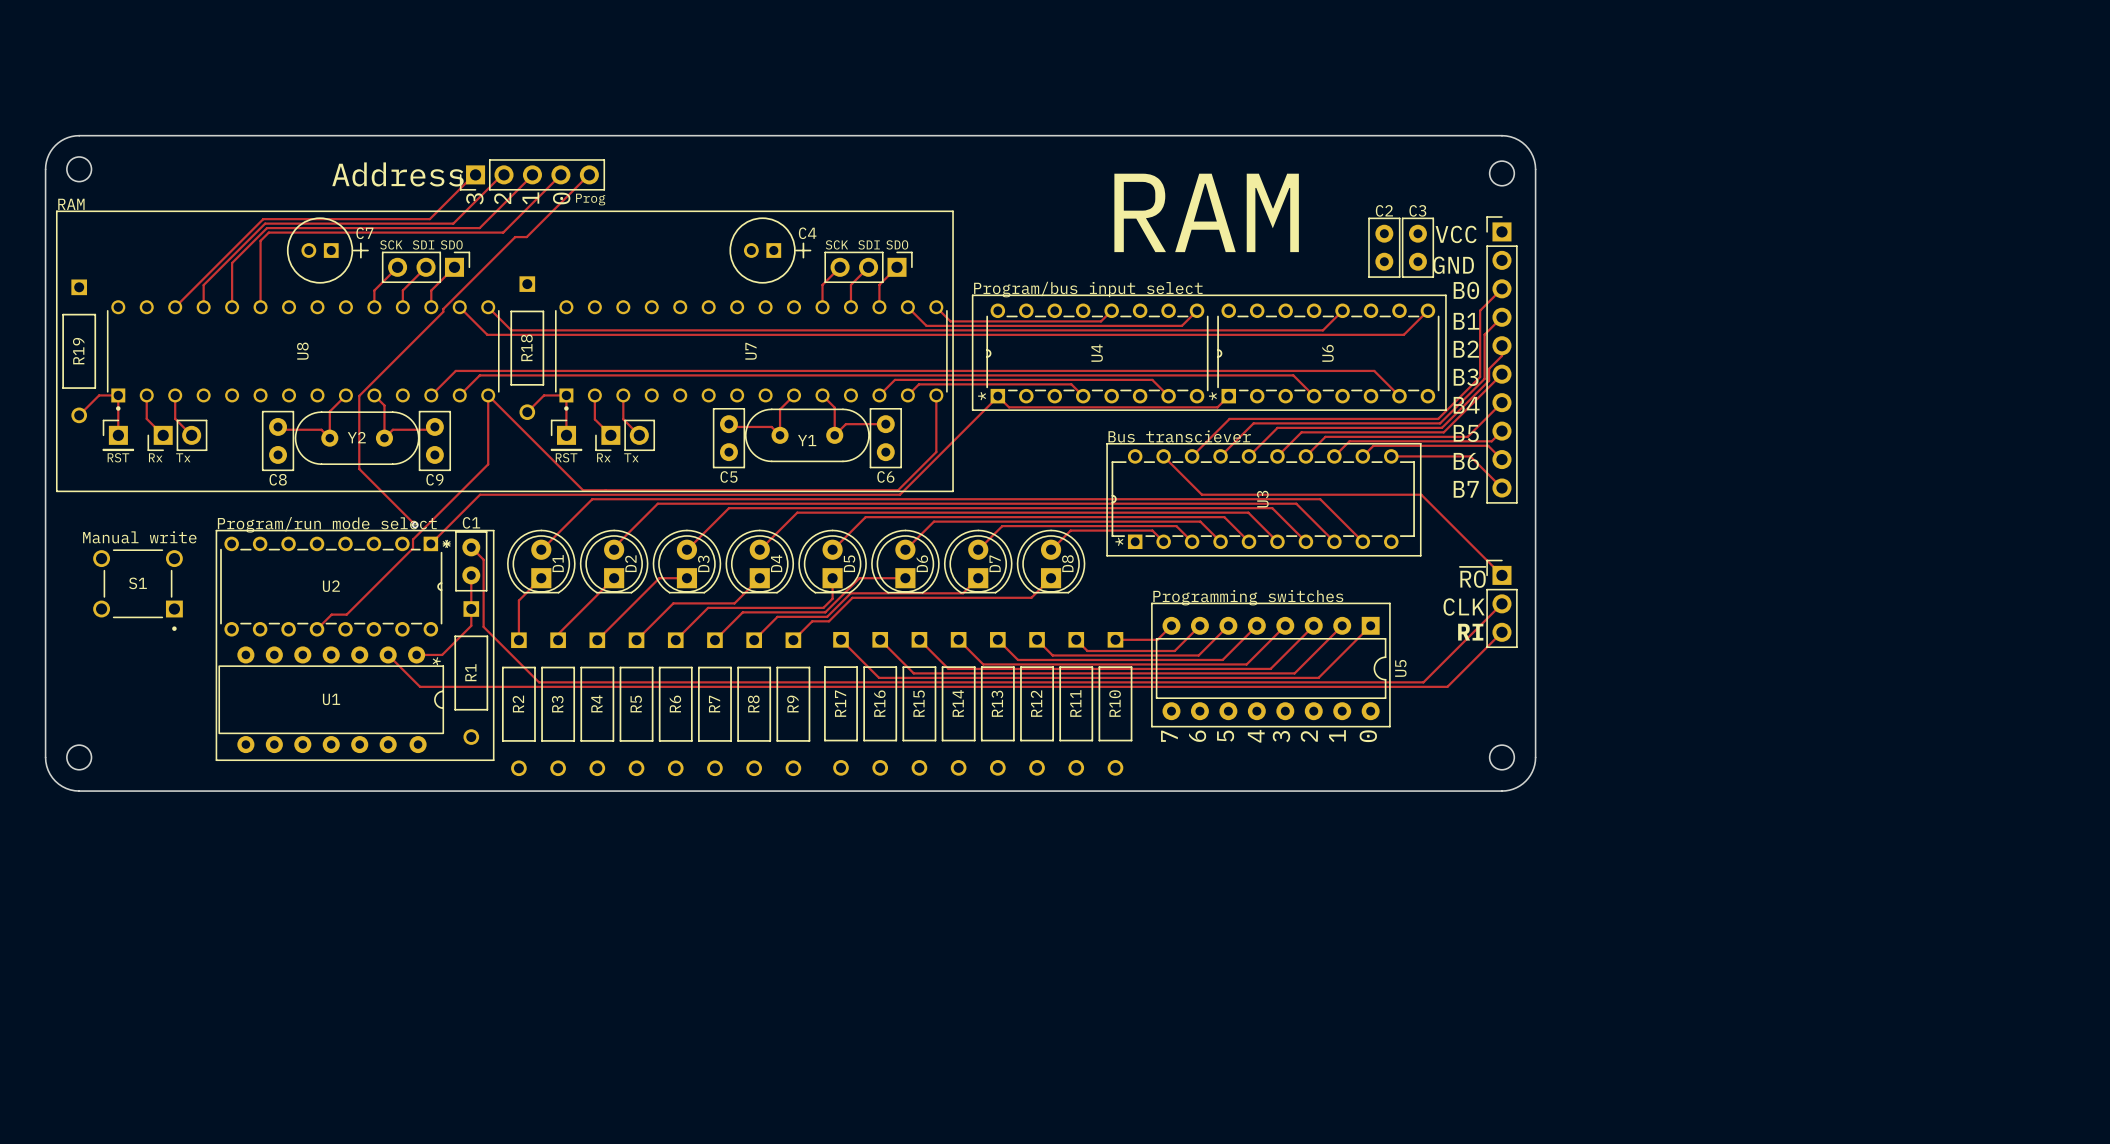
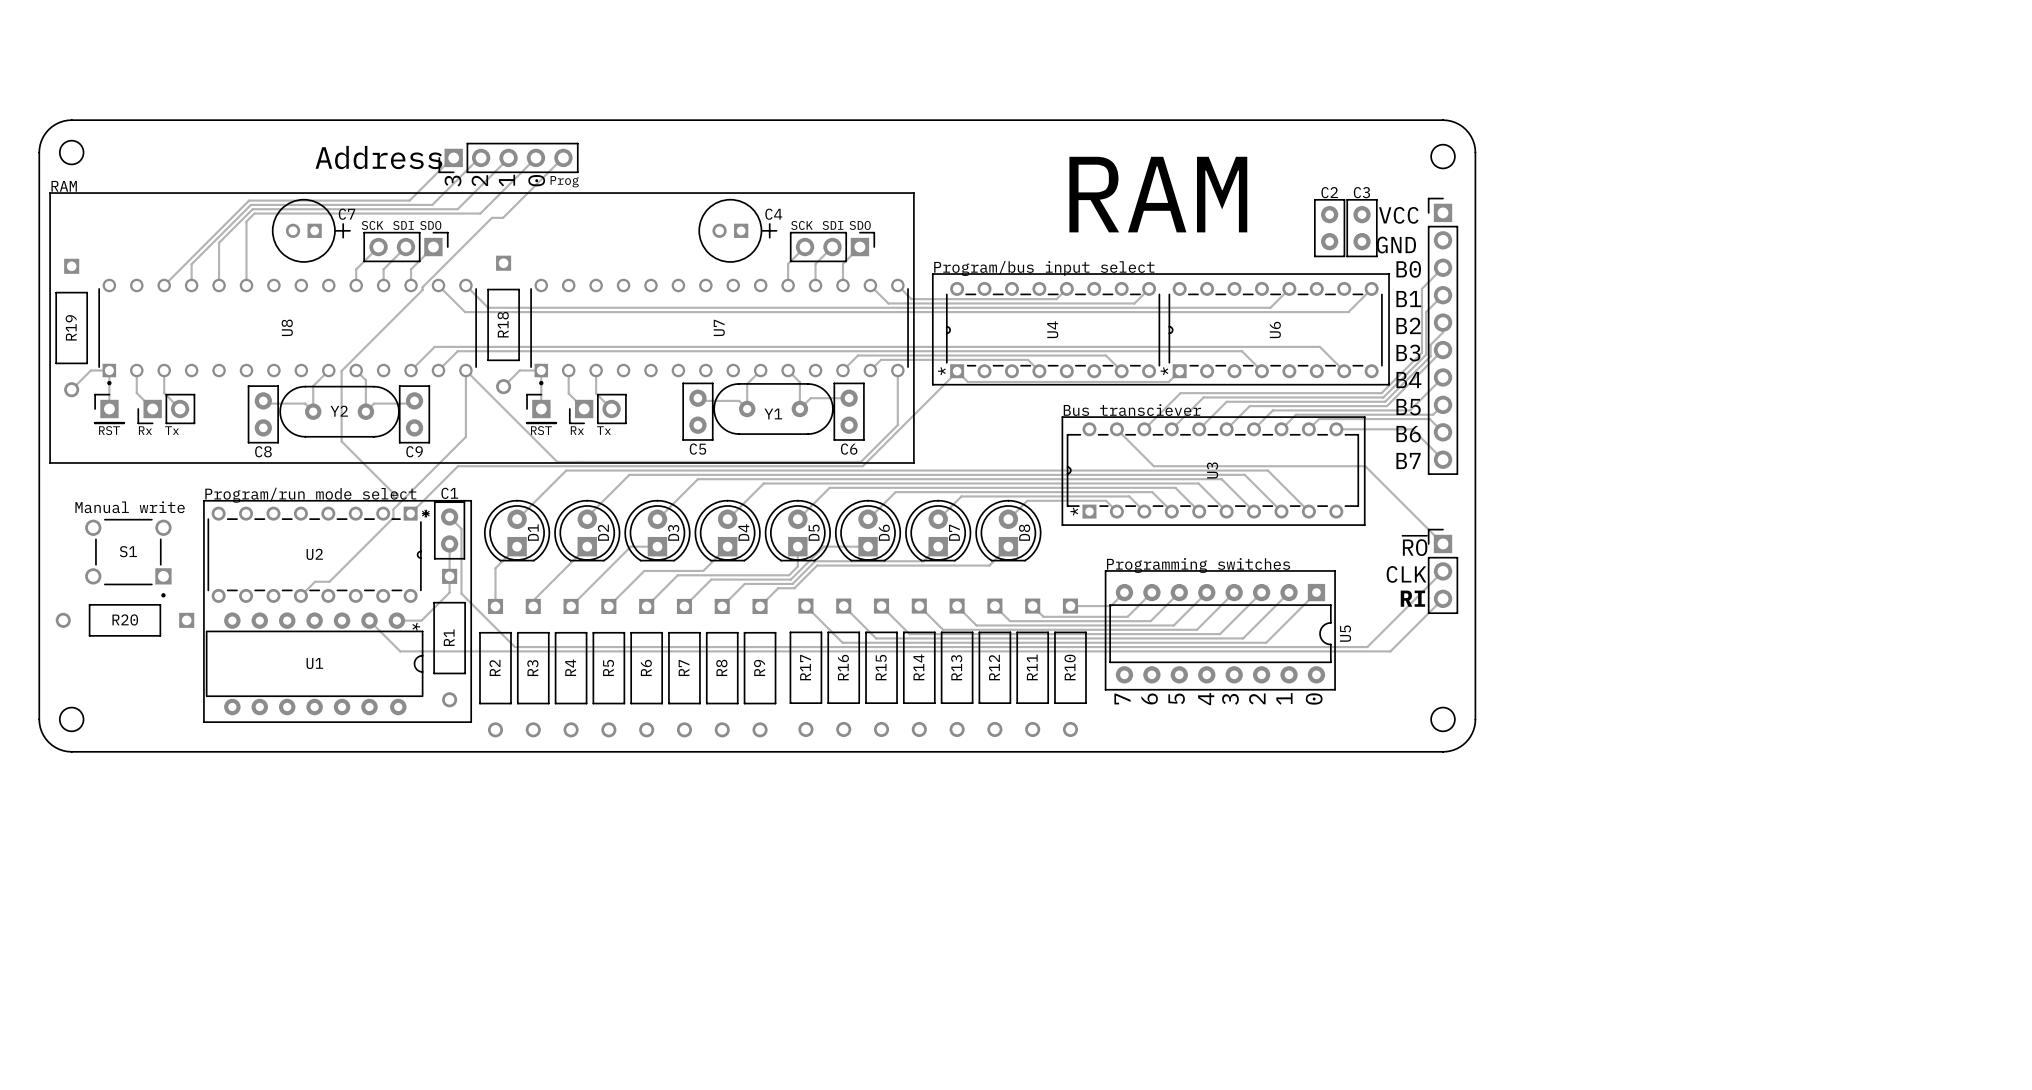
R20: none -> (124, 620)

